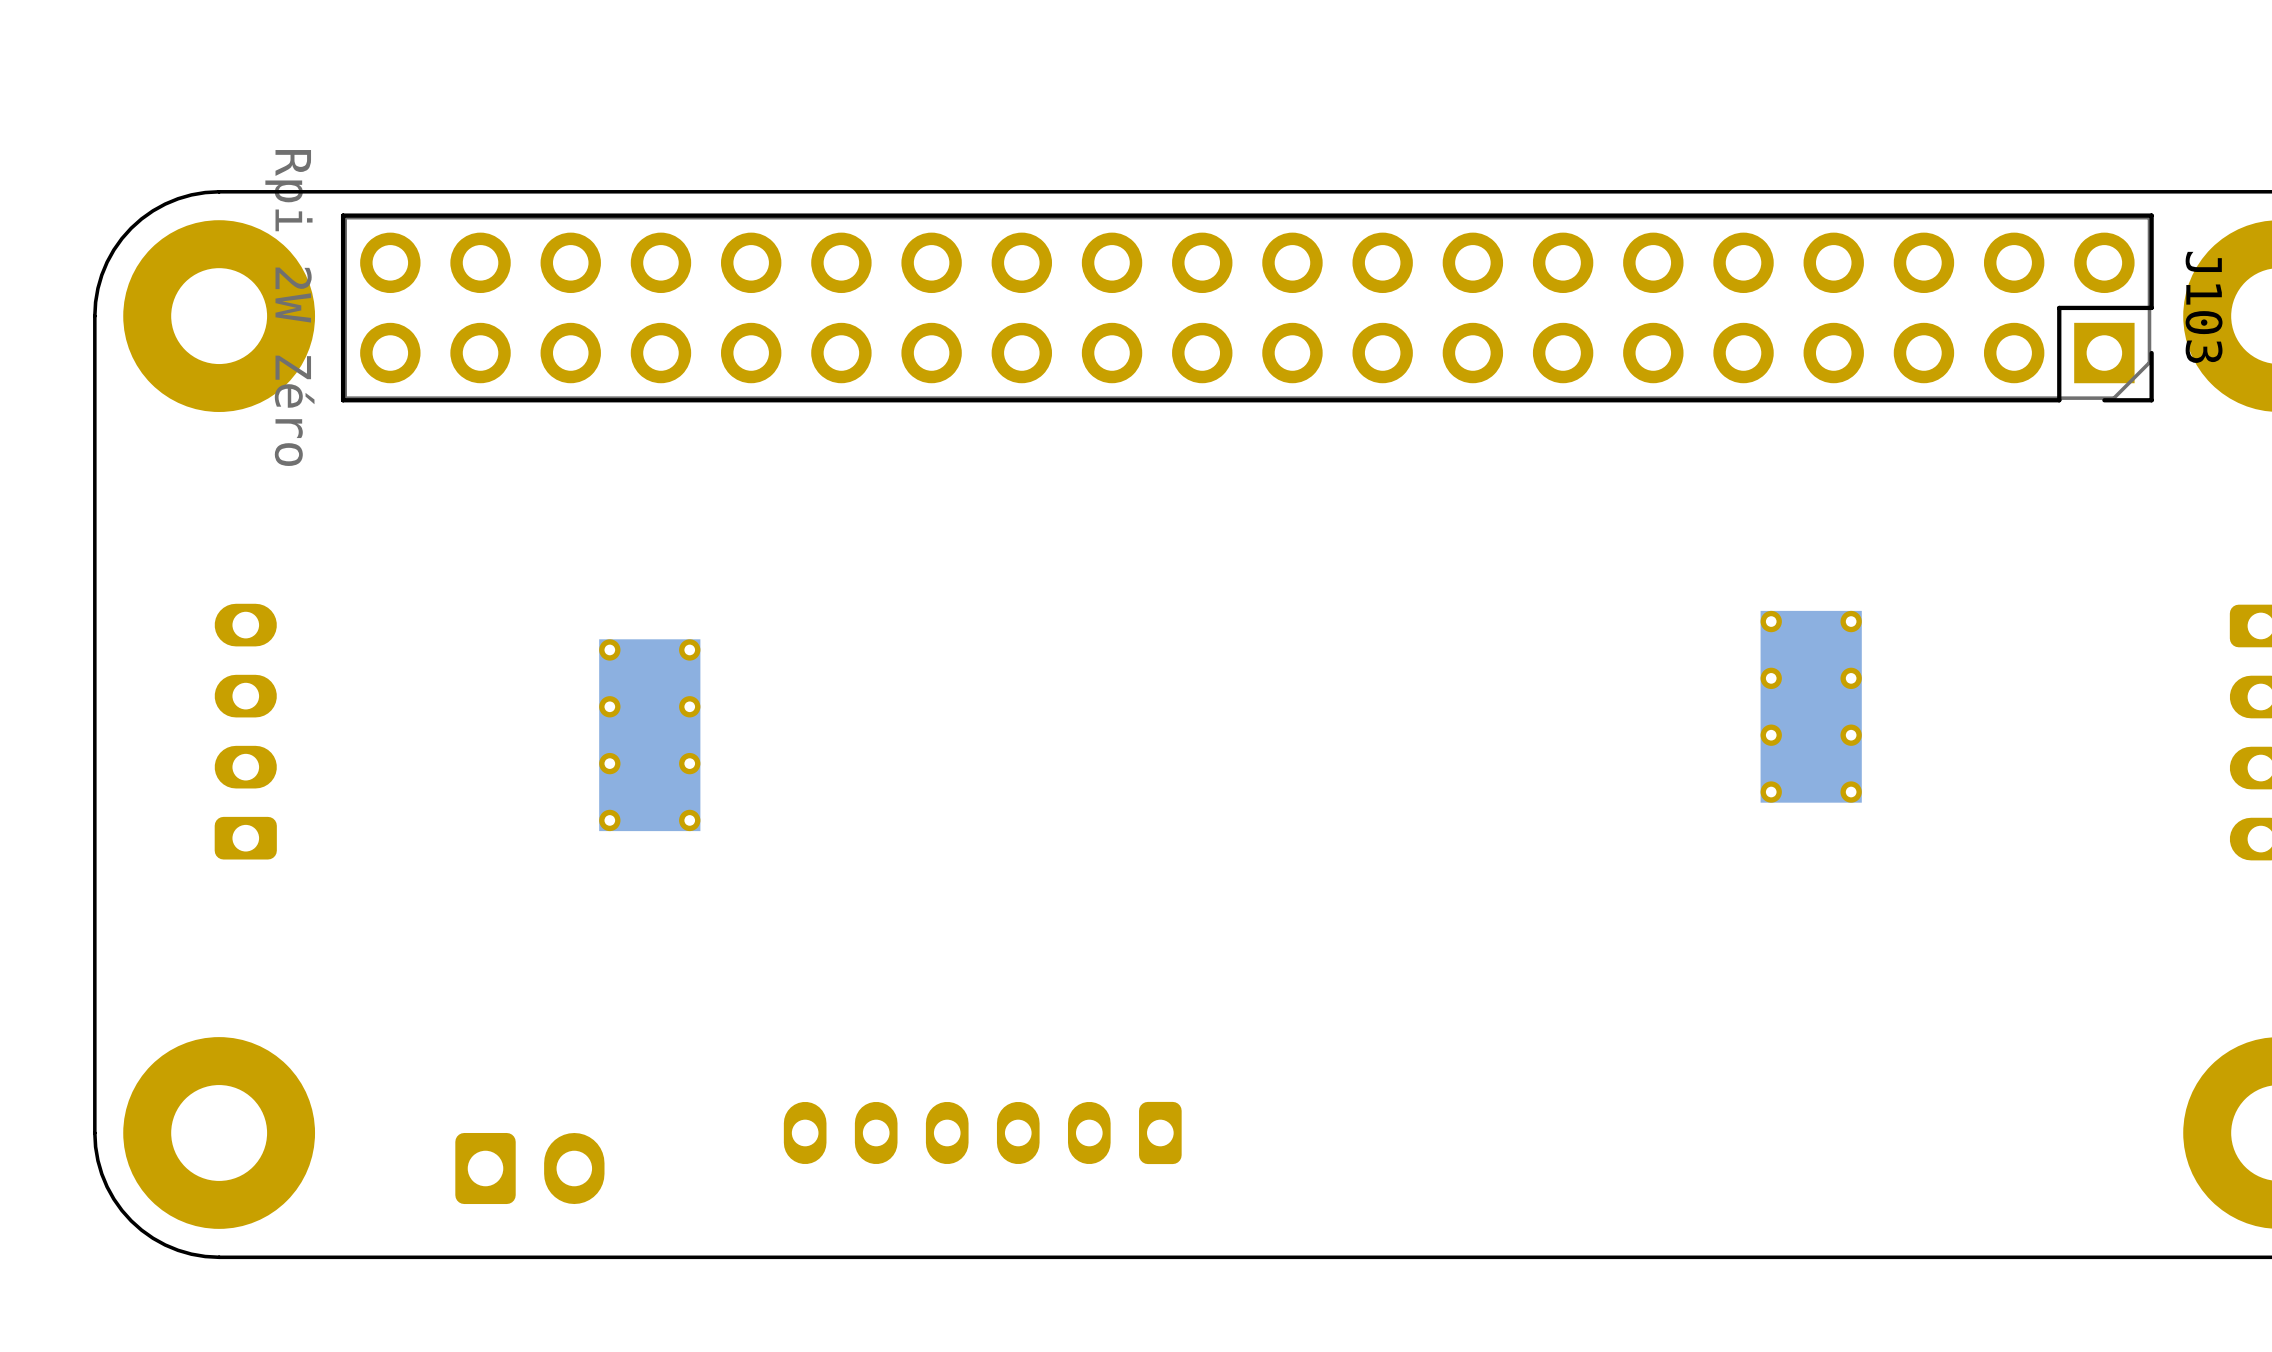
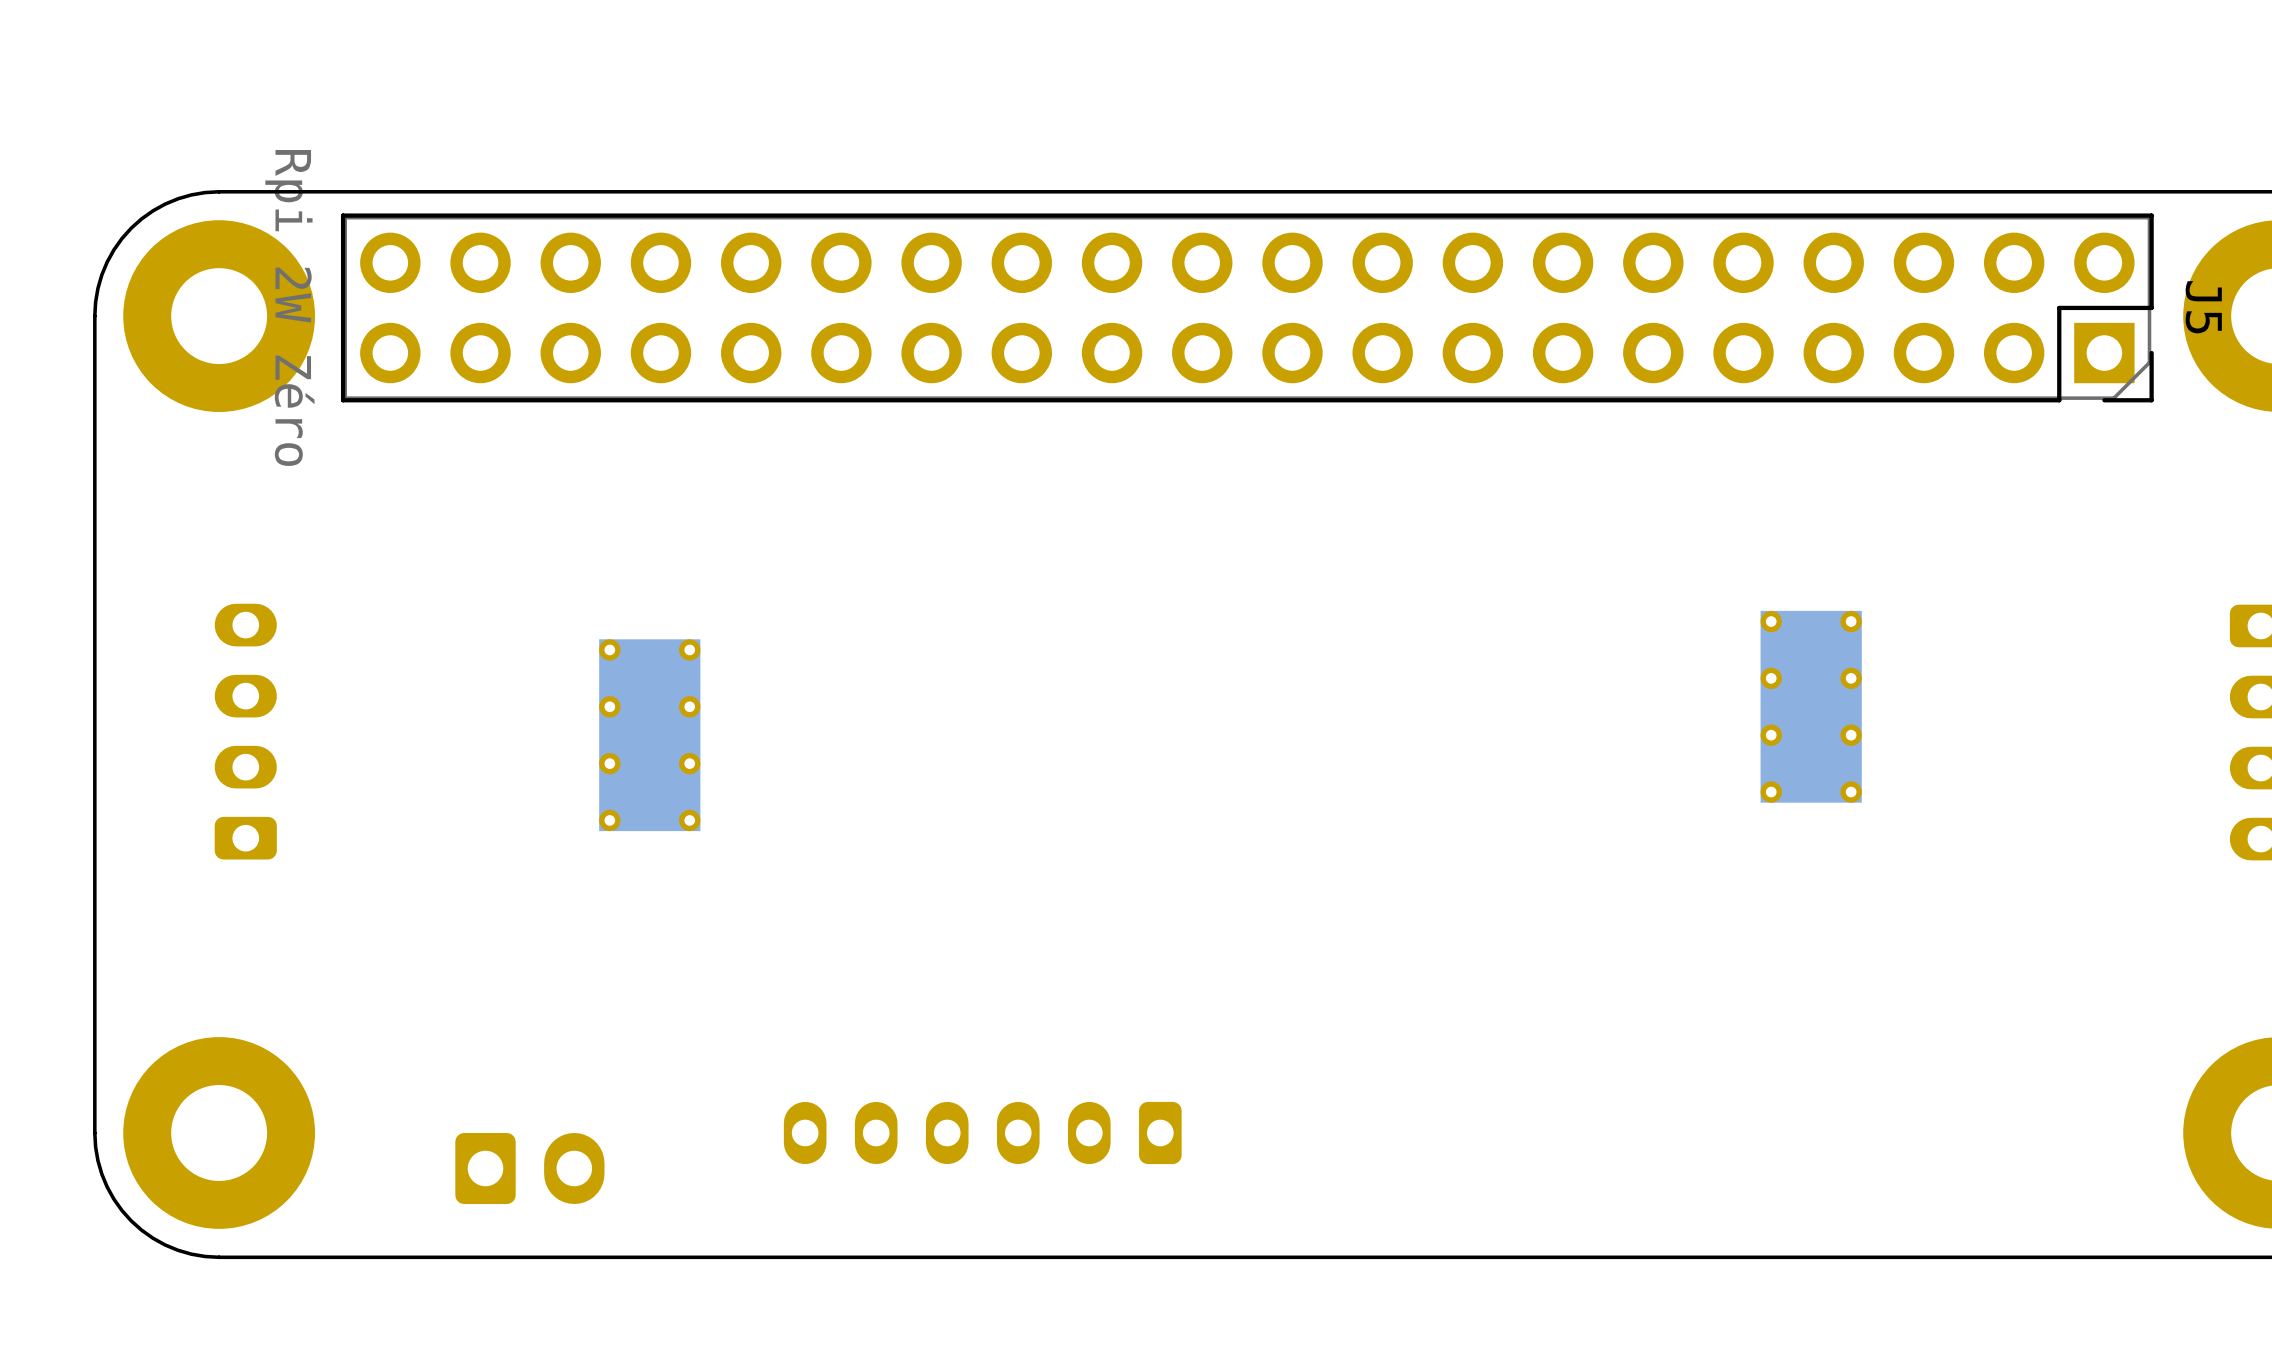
J103 name: J103 (2204, 307) -> J5 (2203, 307)

